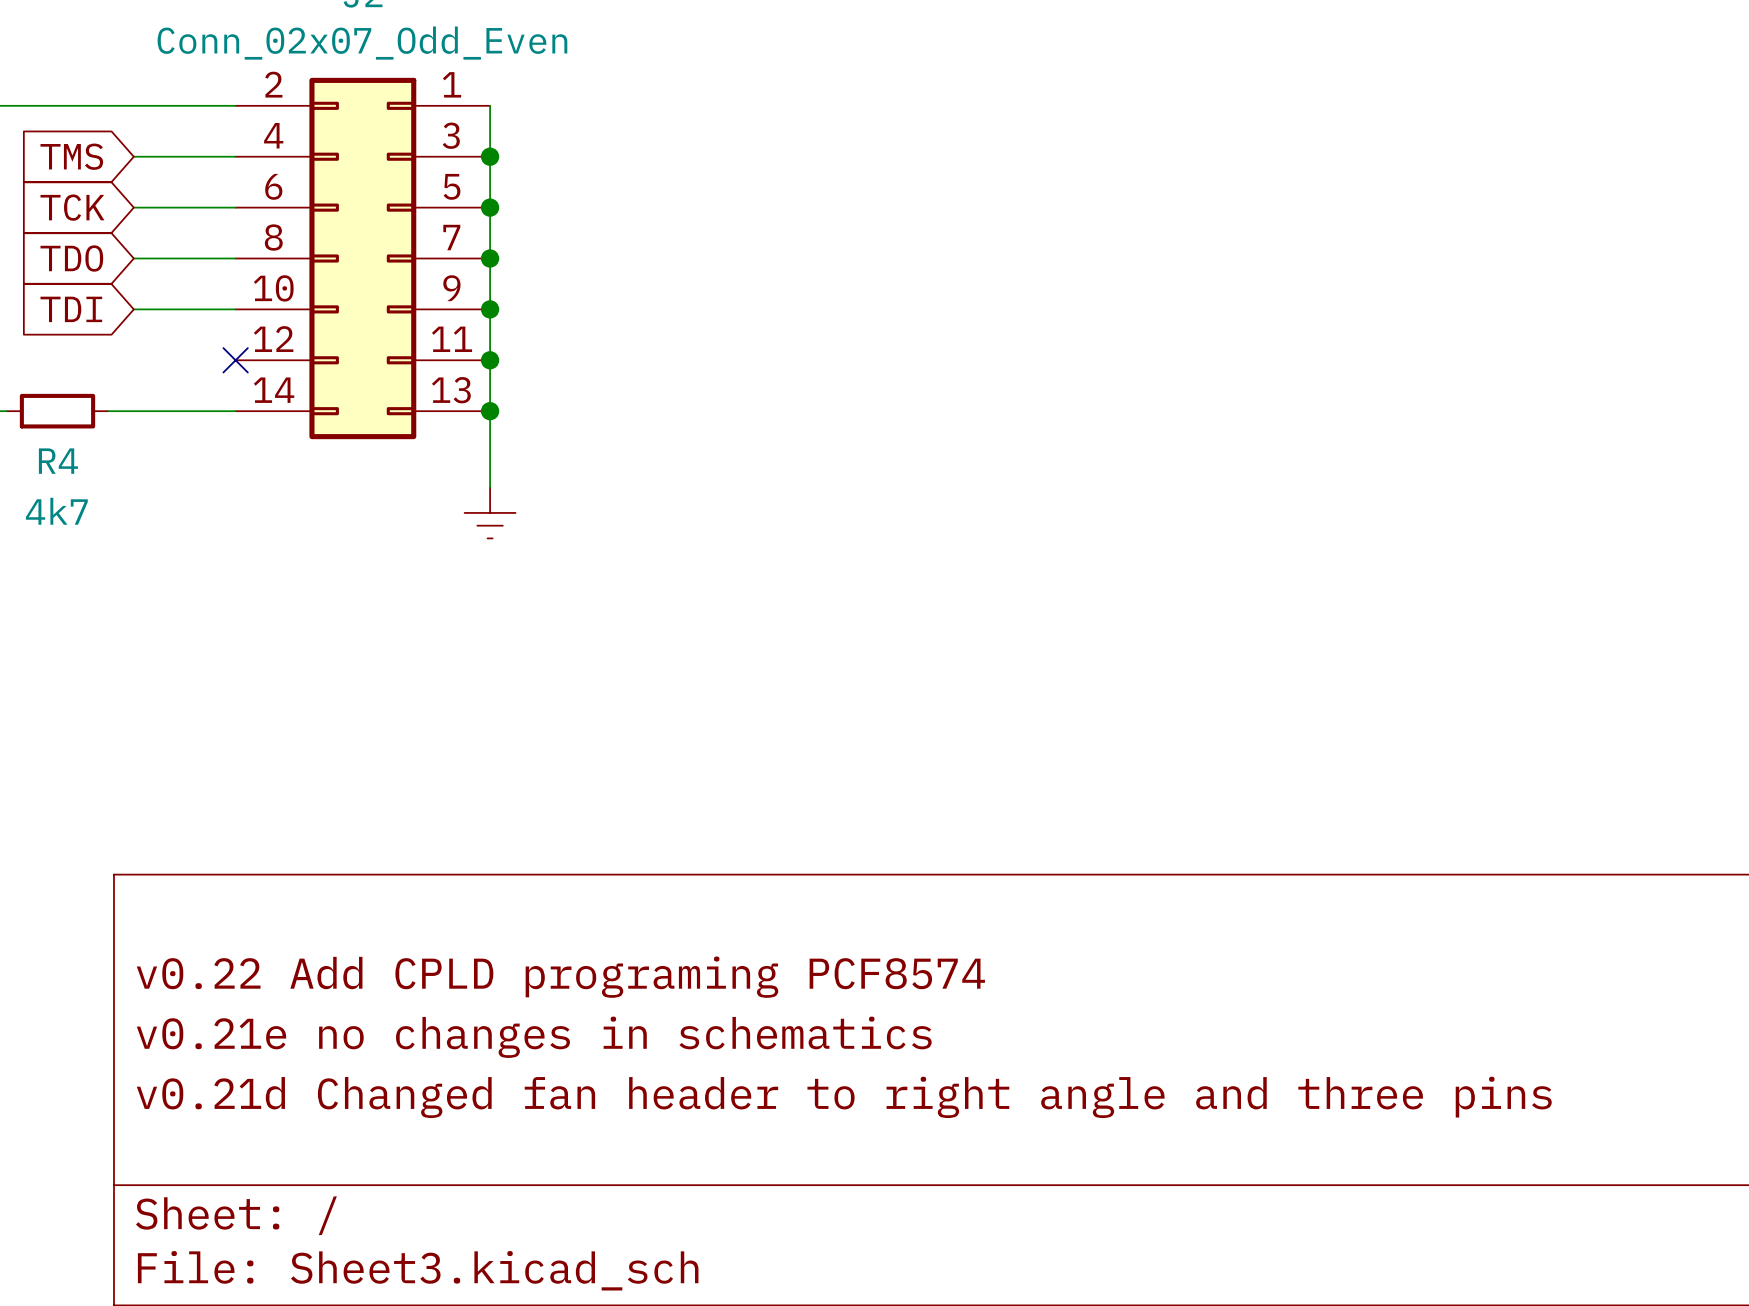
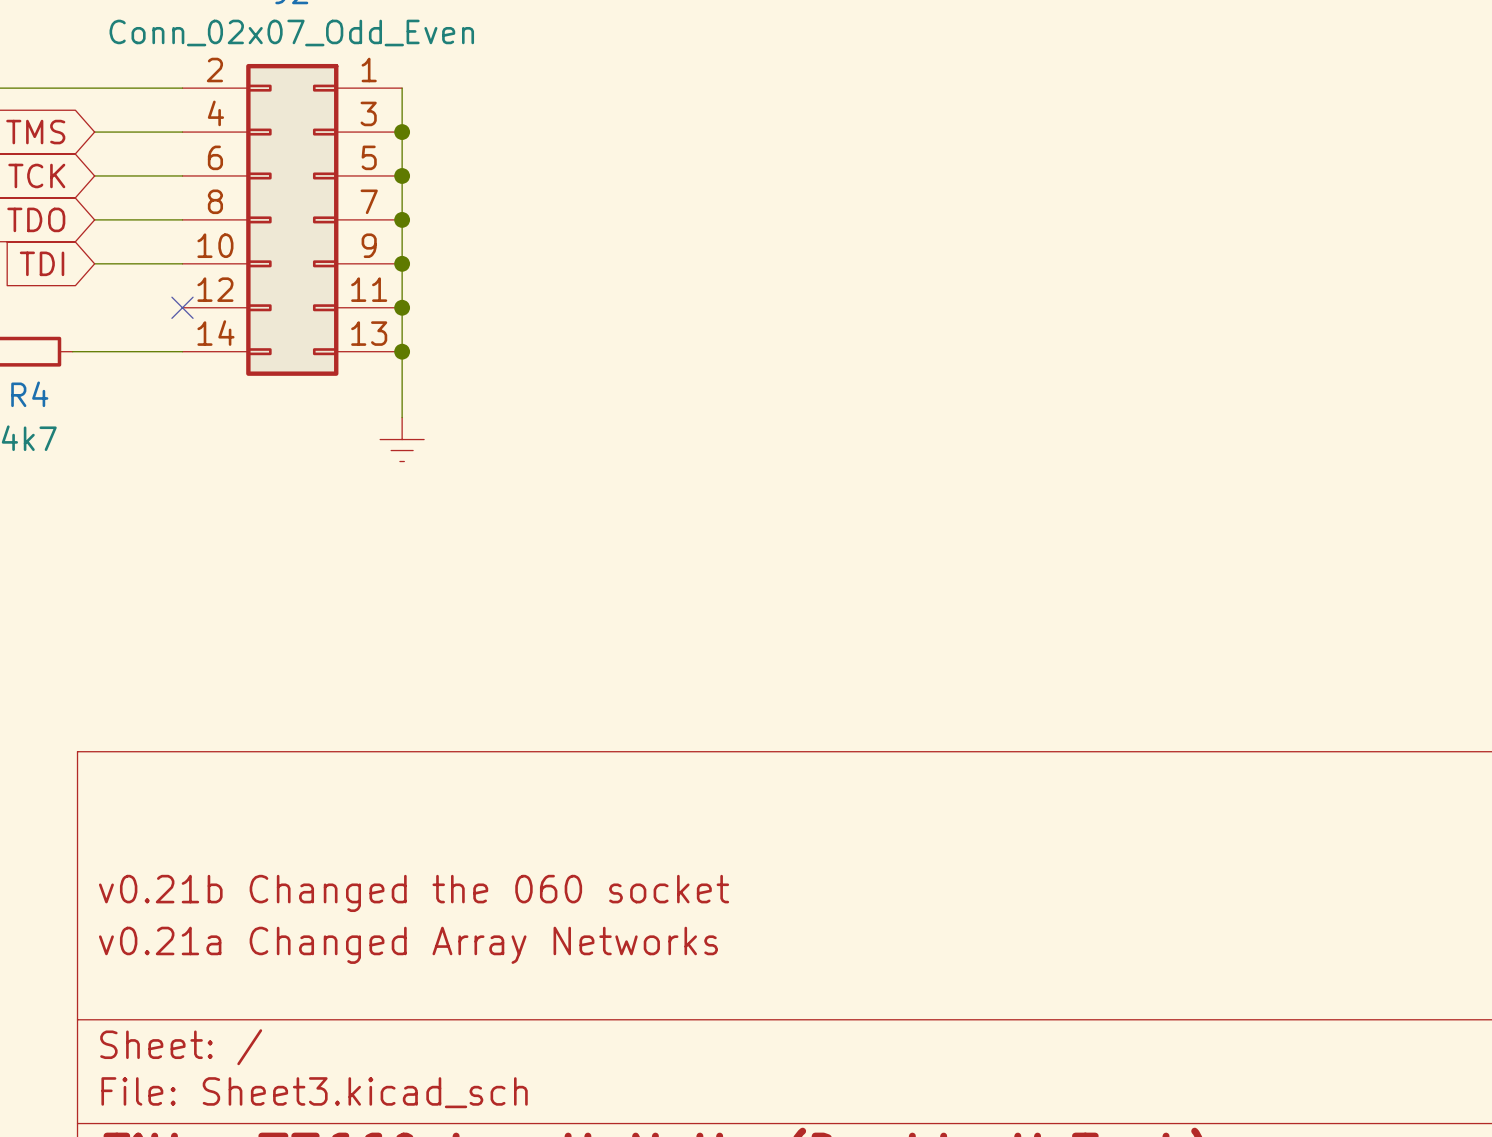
title block: v0.22 Add CPLD programing PCF8574 (560, 977) -> none
title block: v0.21e no changes in schematics (534, 1037) -> v0.21b Changed the 060 socket (414, 893)
title block: v0.21d Changed fan header to right angle and three pins (844, 1097) -> v0.21a Changed Array Networks (408, 945)

